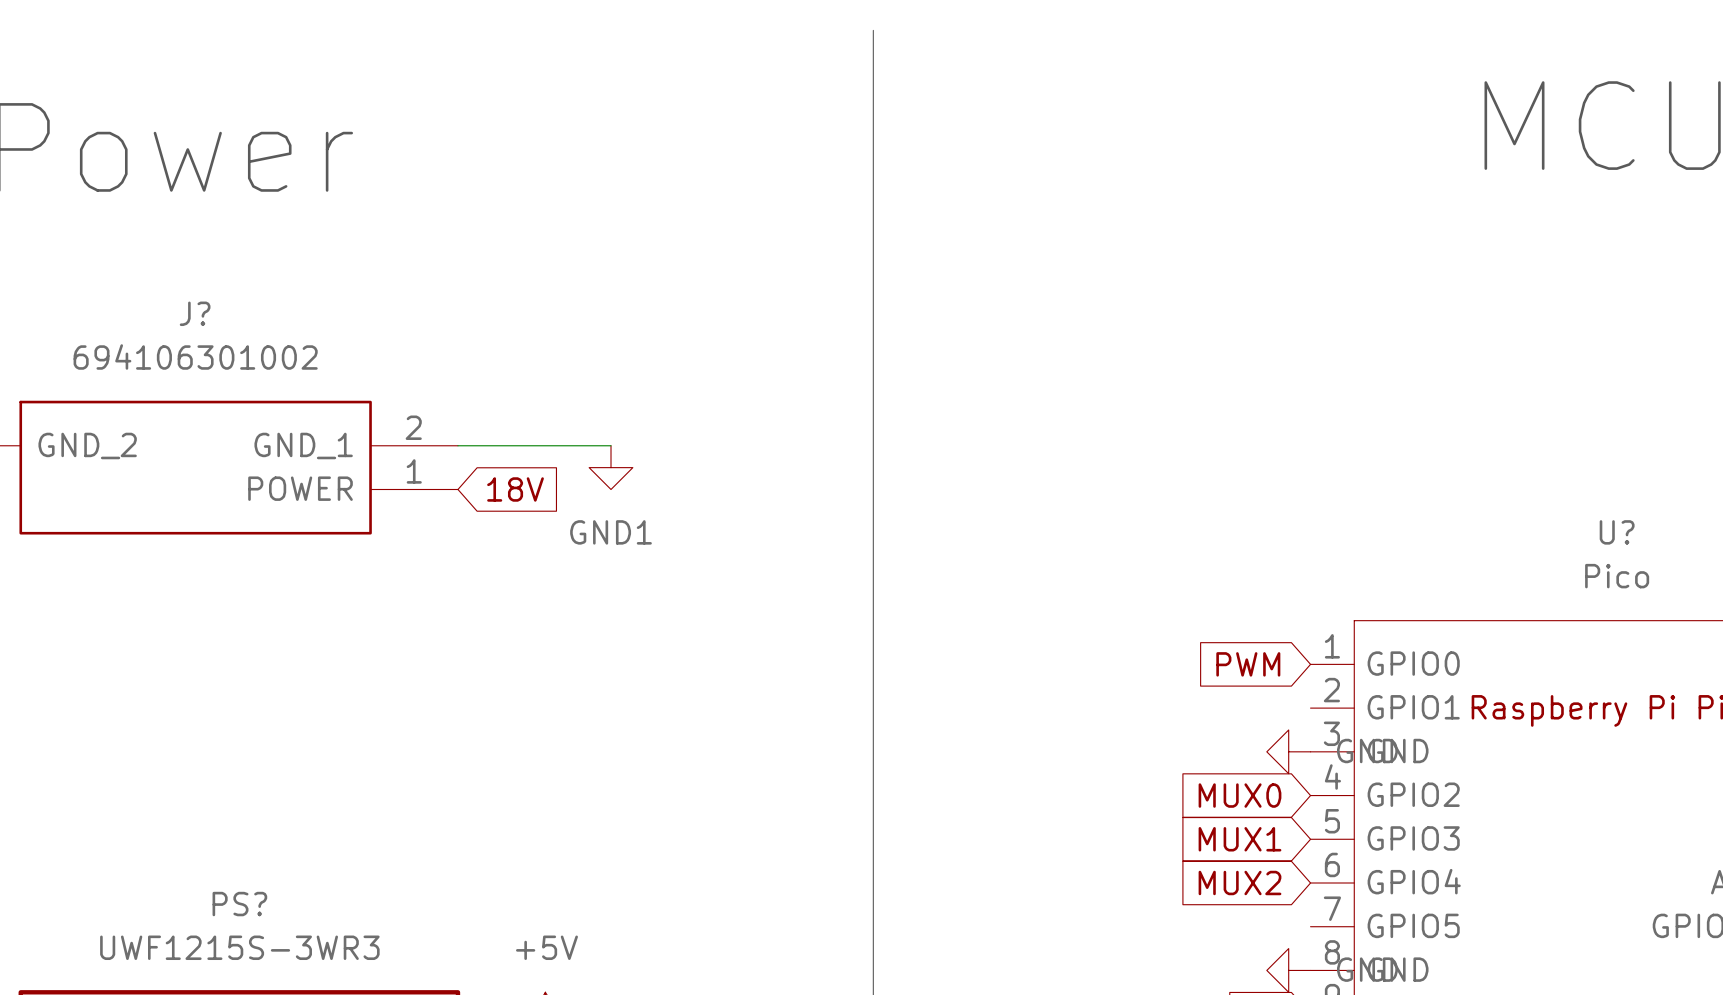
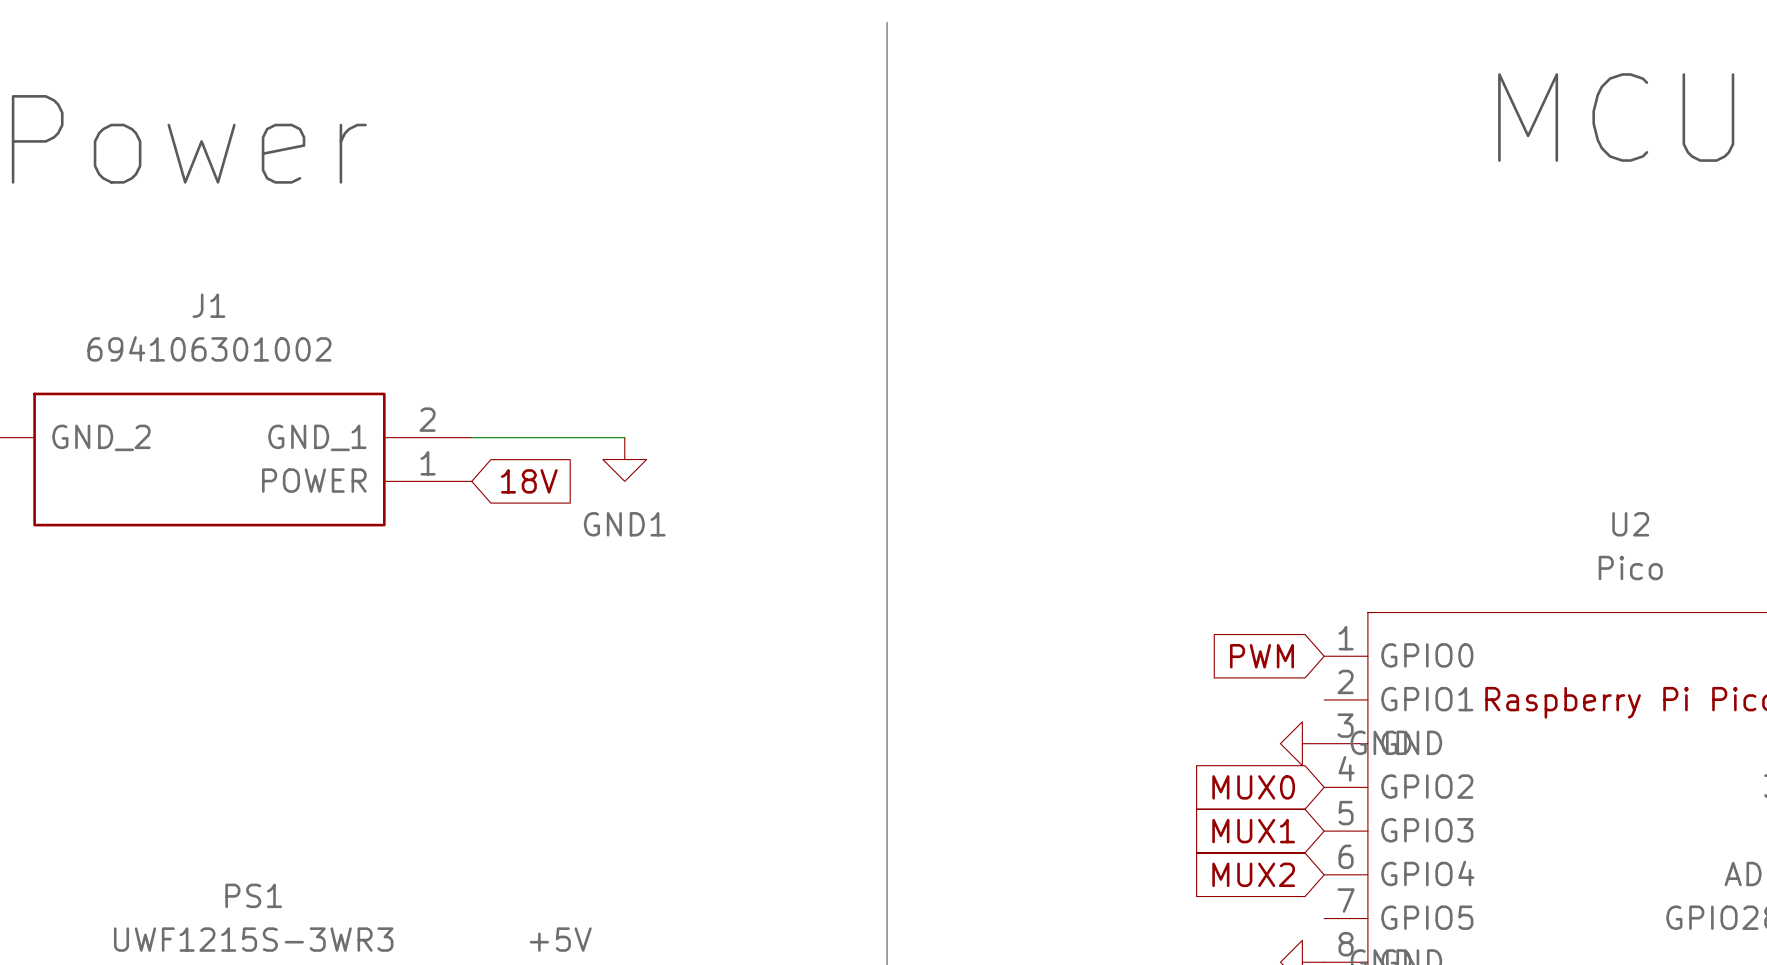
J? name: J? (195, 313) -> J1 (208, 305)
U? name: U? (1617, 532) -> U2 (1630, 524)
PS? name: PS? (239, 904) -> PS1 (253, 895)

